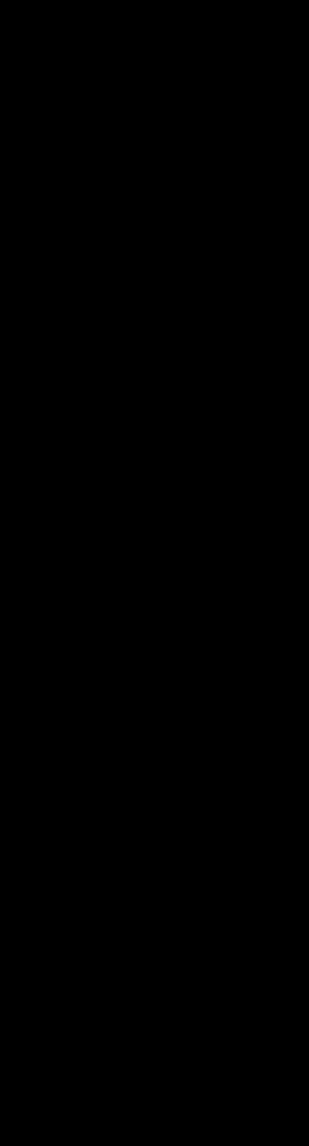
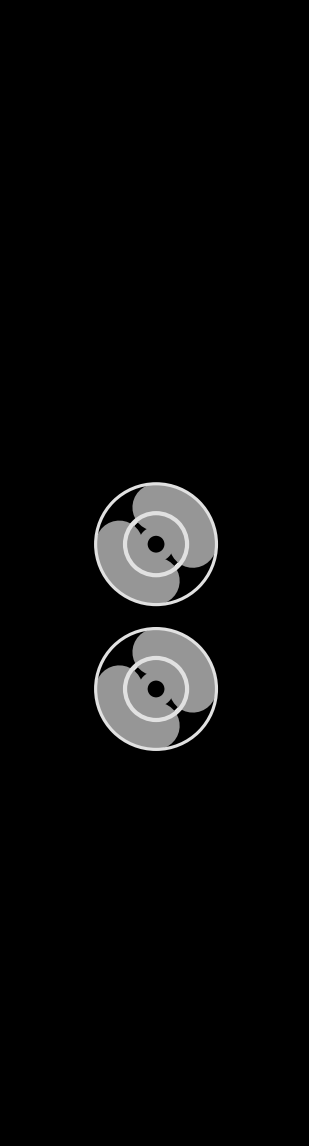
part: none -> (156, 544)
part: none -> (156, 688)

